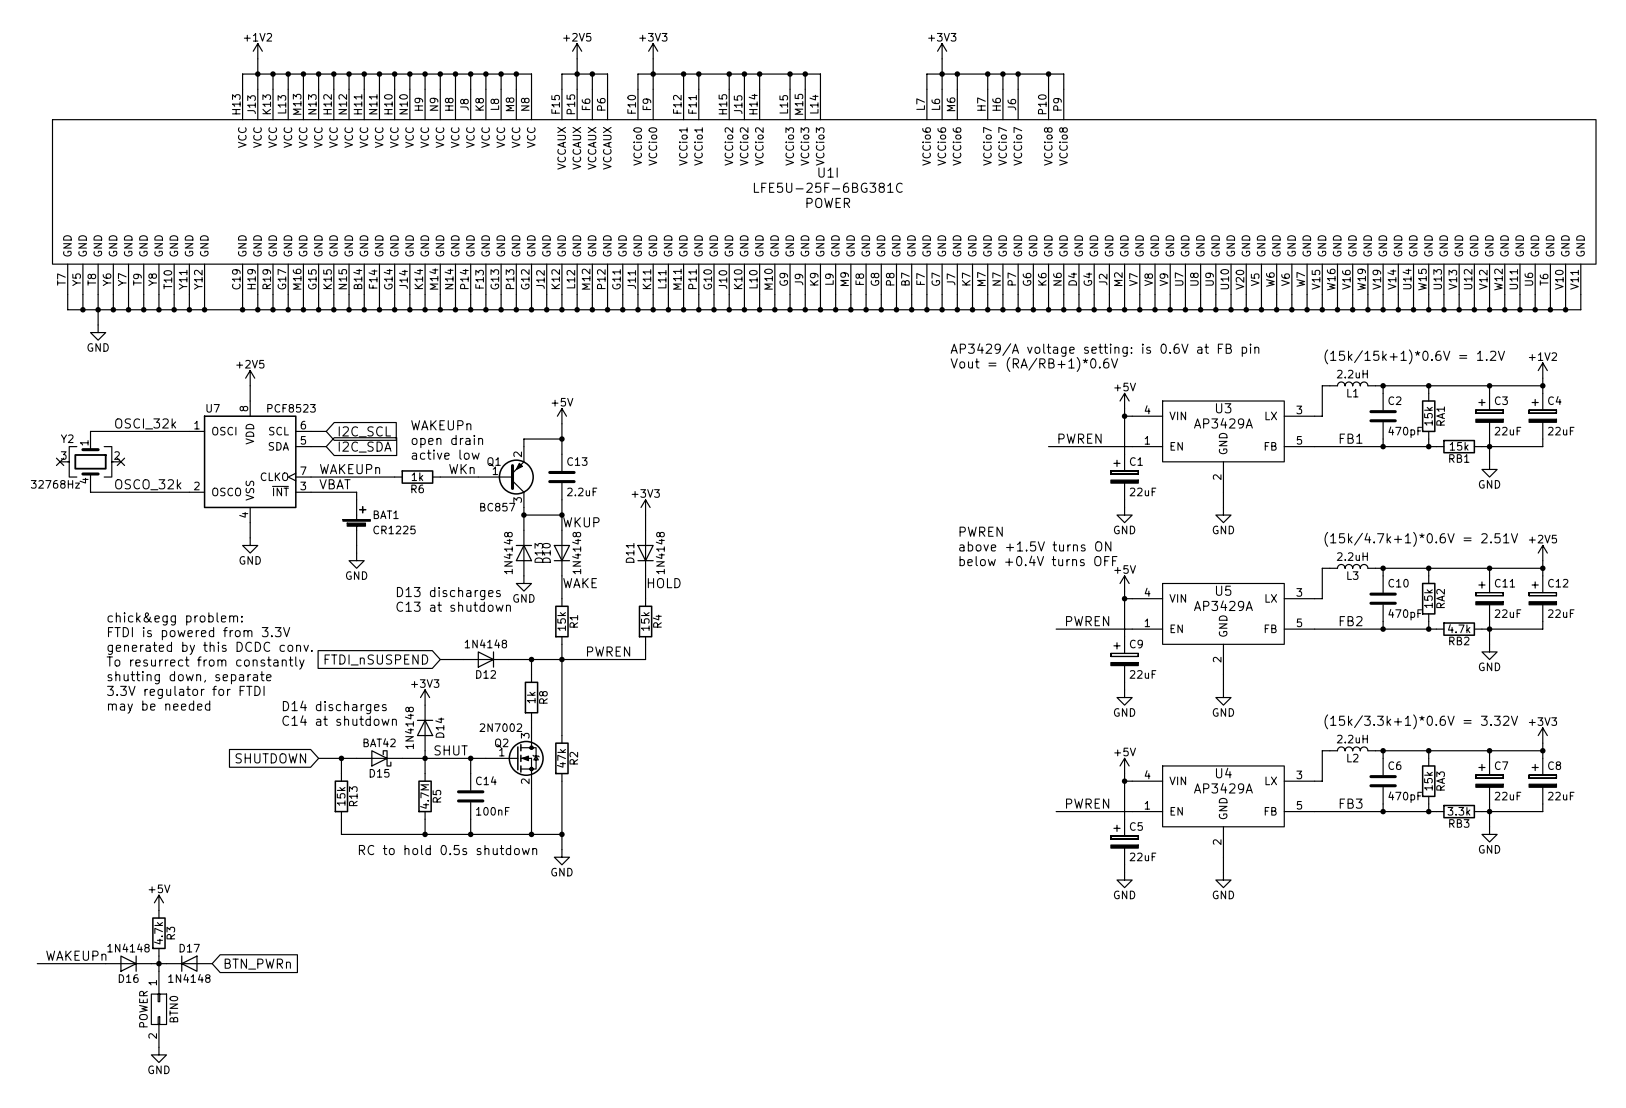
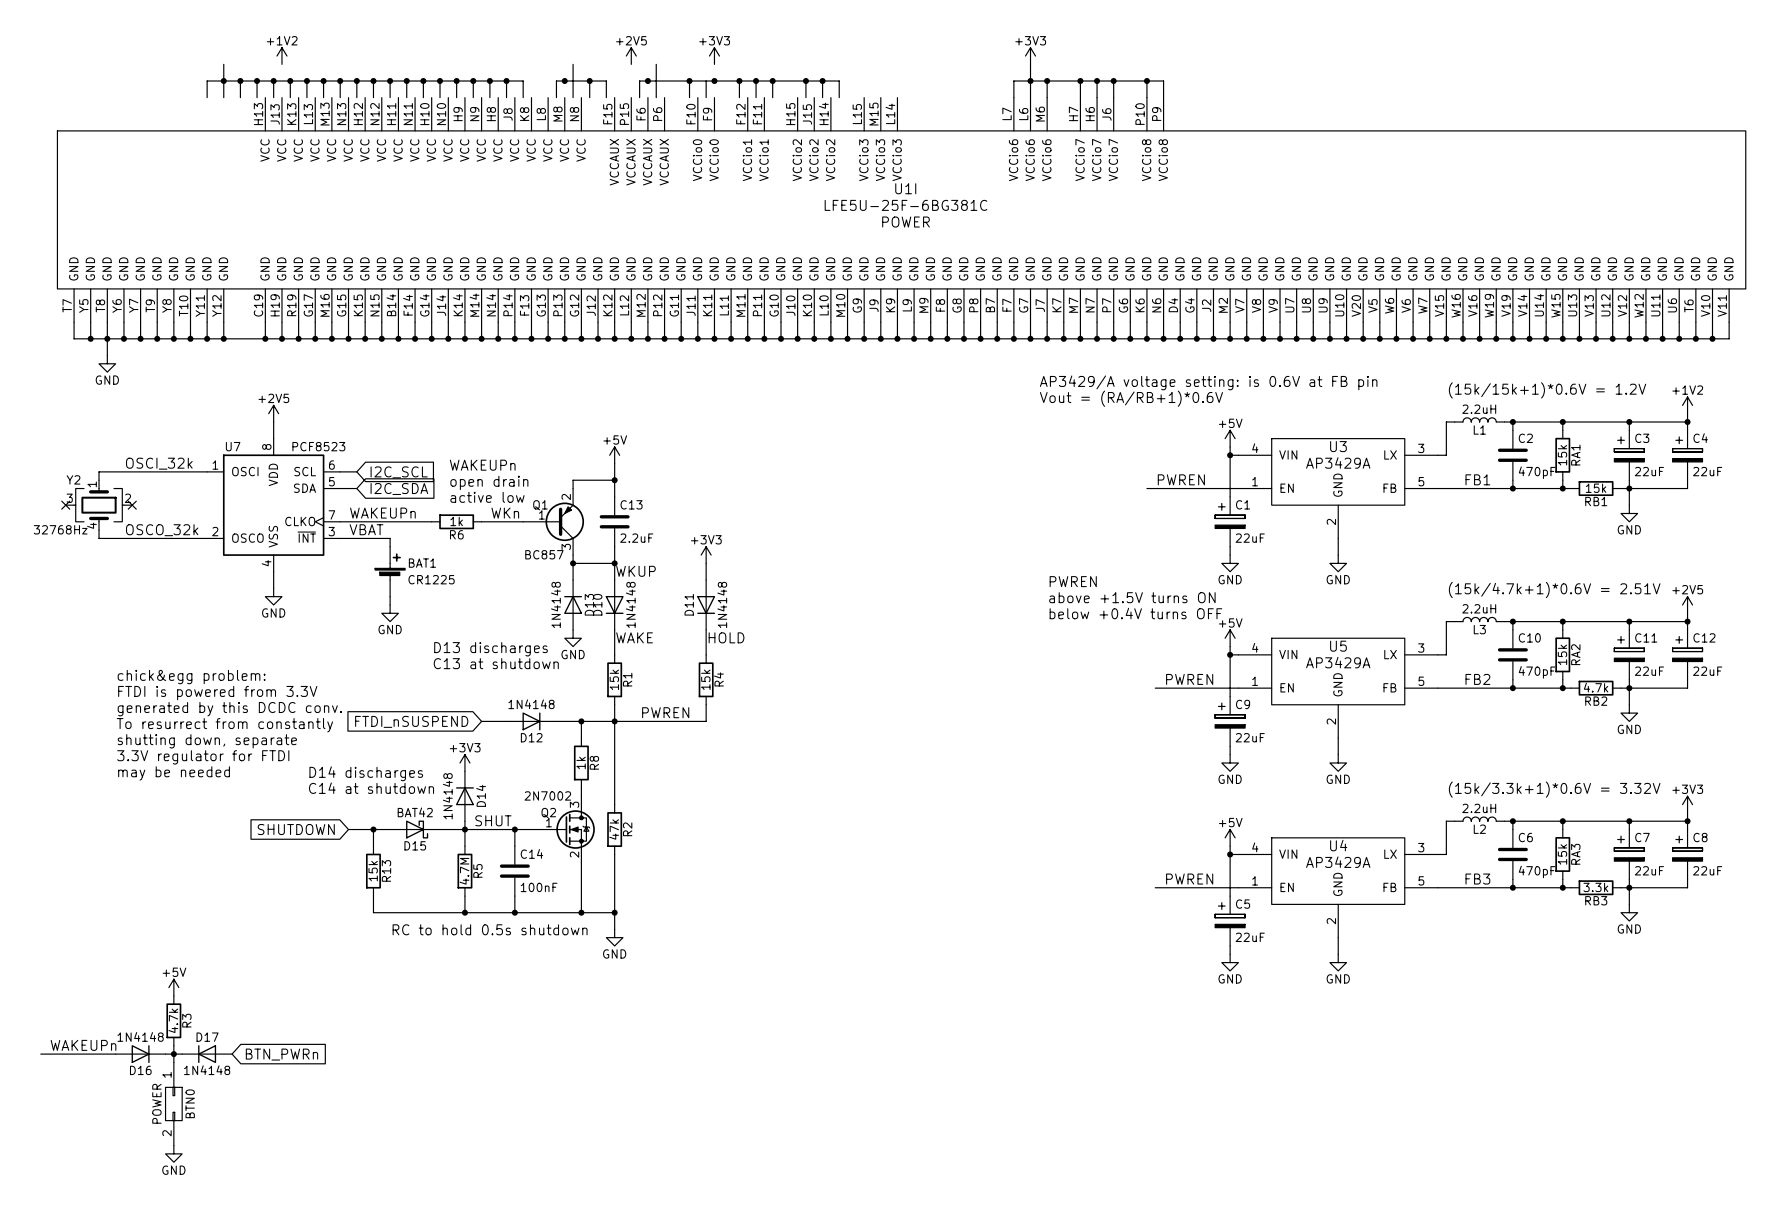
wire: (257, 58) (257, 89) -> (223, 64) (223, 97)
wire: (577, 58) (577, 89) -> (573, 64) (573, 97)
wire: (653, 58) (653, 89) -> (656, 64) (656, 97)
junction: none -> (223, 81)
junction: none -> (240, 81)
junction: none -> (257, 81)
wire: (242, 74) (242, 89) -> (265, 81) (207, 81) (207, 97)
junction: none -> (273, 81)
junction: (257, 74) -> none
junction: none -> (290, 81)
wire: (273, 74) (273, 89) -> (240, 81) (240, 97)
junction: (273, 74) -> none
junction: none -> (306, 81)
wire: (288, 74) (288, 89) -> (257, 81) (257, 97)
junction: (288, 74) -> none
junction: none -> (323, 81)
wire: (303, 74) (303, 89) -> (273, 81) (273, 97)
junction: (303, 74) -> none
junction: none -> (340, 81)
wire: (318, 74) (318, 89) -> (290, 81) (290, 97)
junction: (318, 74) -> none
junction: none -> (356, 81)
wire: (333, 74) (333, 89) -> (306, 81) (306, 97)
junction: (333, 74) -> none
junction: none -> (373, 81)
wire: (349, 74) (349, 89) -> (323, 81) (323, 97)
junction: (349, 74) -> none
junction: none -> (390, 81)
wire: (364, 74) (364, 89) -> (340, 81) (340, 97)
junction: (364, 74) -> none
junction: none -> (406, 81)
wire: (379, 74) (379, 89) -> (356, 81) (356, 97)
junction: (379, 74) -> none
junction: none -> (423, 81)
wire: (394, 74) (394, 89) -> (373, 81) (373, 97)
junction: (394, 74) -> none
junction: none -> (440, 81)
wire: (409, 74) (409, 89) -> (390, 81) (390, 97)
junction: (409, 74) -> none
junction: none -> (456, 81)
wire: (425, 74) (425, 89) -> (406, 81) (406, 97)
junction: (425, 74) -> none
junction: none -> (473, 81)
wire: (440, 74) (440, 89) -> (423, 81) (423, 97)
junction: (440, 74) -> none
junction: none -> (489, 81)
wire: (455, 74) (455, 89) -> (440, 81) (440, 97)
junction: (455, 74) -> none
junction: none -> (506, 81)
wire: (470, 74) (470, 89) -> (456, 81) (456, 97)
junction: (470, 74) -> none
wire: (478, 74) (508, 74) -> (523, 81) (523, 97)
wire: (485, 74) (485, 89) -> (473, 81) (473, 97)
junction: (485, 74) -> none
wire: (501, 74) (501, 89) -> (489, 81) (489, 97)
junction: (501, 74) -> none
wire: (516, 74) (516, 89) -> (506, 81) (506, 97)
wire: (531, 74) (531, 89) -> (581, 81) (606, 81) (606, 97)
junction: none -> (589, 81)
junction: (577, 74) -> none
wire: (584, 74) (561, 74) (561, 89) -> (639, 81) (639, 97)
wire: (592, 74) (592, 89) -> (589, 81) (589, 97)
wire: (607, 74) (607, 89) -> (664, 81) (697, 81)
junction: none -> (689, 81)
wire: (637, 74) (637, 89) -> (556, 81) (556, 97)
junction: none -> (739, 81)
wire: (683, 74) (683, 89) -> (689, 81) (689, 97)
junction: (683, 74) -> none
junction: none -> (756, 81)
wire: (698, 74) (698, 89) -> (706, 81) (706, 97)
junction: (698, 74) -> none
junction: none -> (772, 81)
wire: (729, 74) (729, 89) -> (739, 81) (739, 97)
junction: (729, 74) -> none
junction: none -> (805, 81)
wire: (744, 74) (744, 89) -> (756, 81) (756, 97)
junction: (744, 74) -> none
junction: none -> (822, 81)
wire: (759, 74) (759, 89) -> (772, 81) (772, 97)
junction: (759, 74) -> none
wire: (767, 74) (820, 74) (820, 89) -> (839, 81) (839, 97)
wire: (790, 74) (790, 89) -> (805, 81) (805, 97)
junction: (790, 74) -> none
wire: (805, 74) (805, 89) -> (822, 81) (822, 97)
junction: (805, 74) -> none

